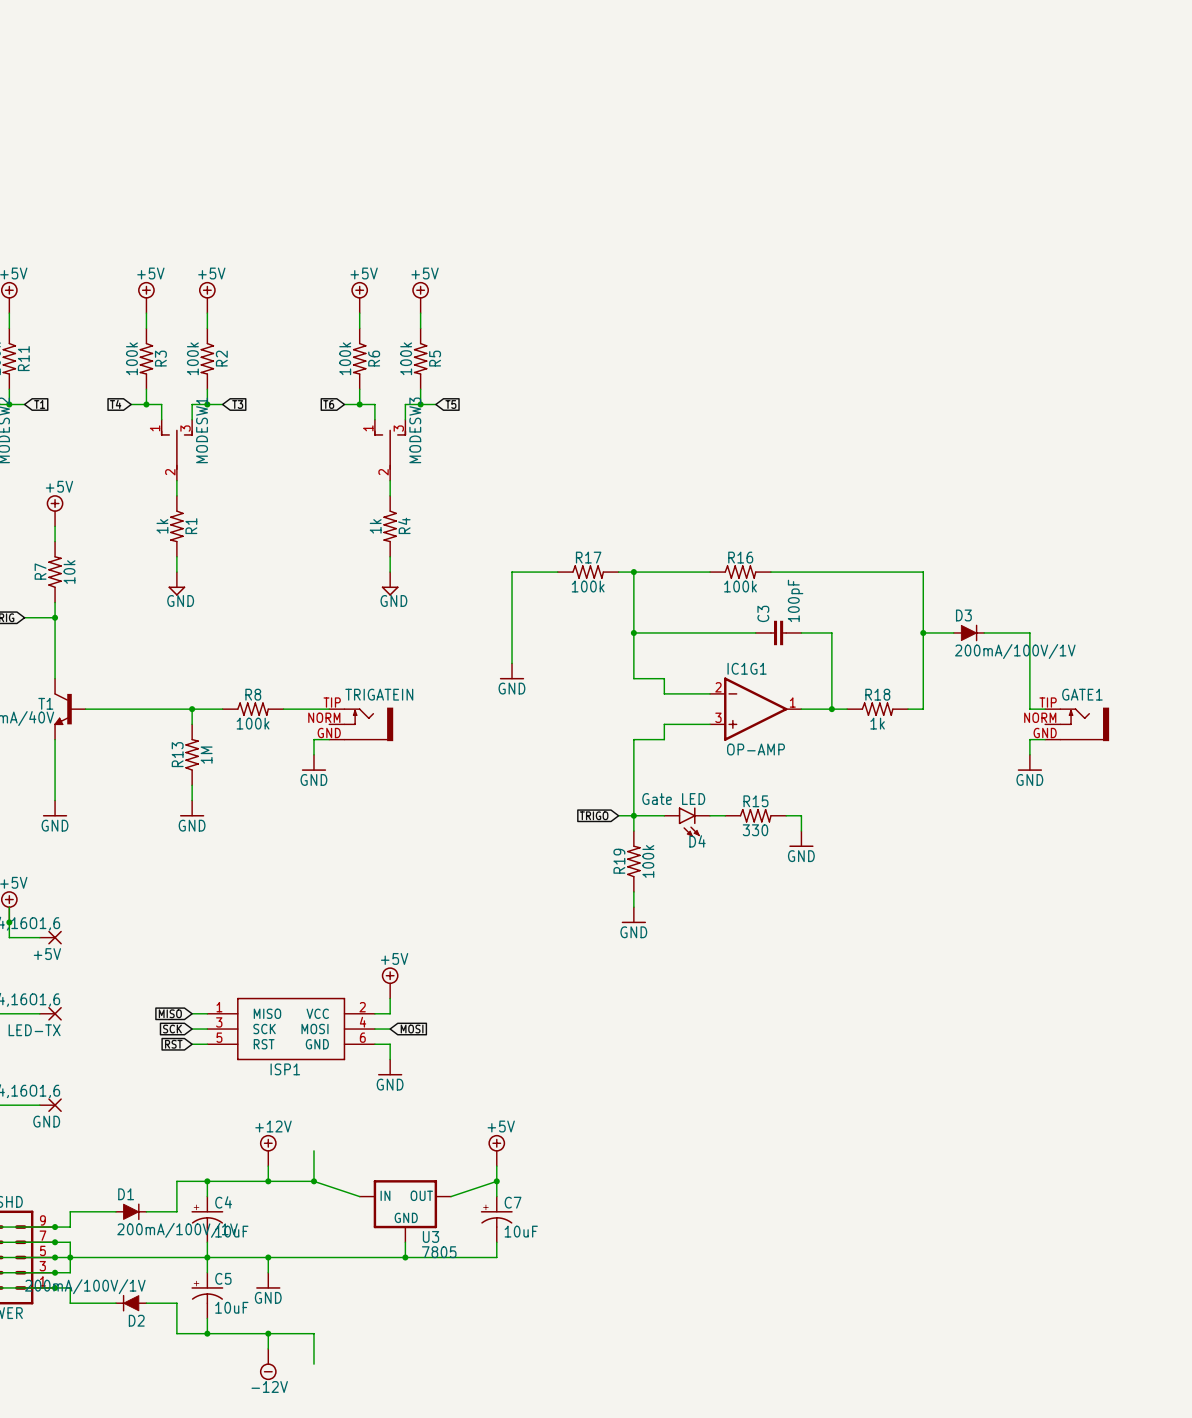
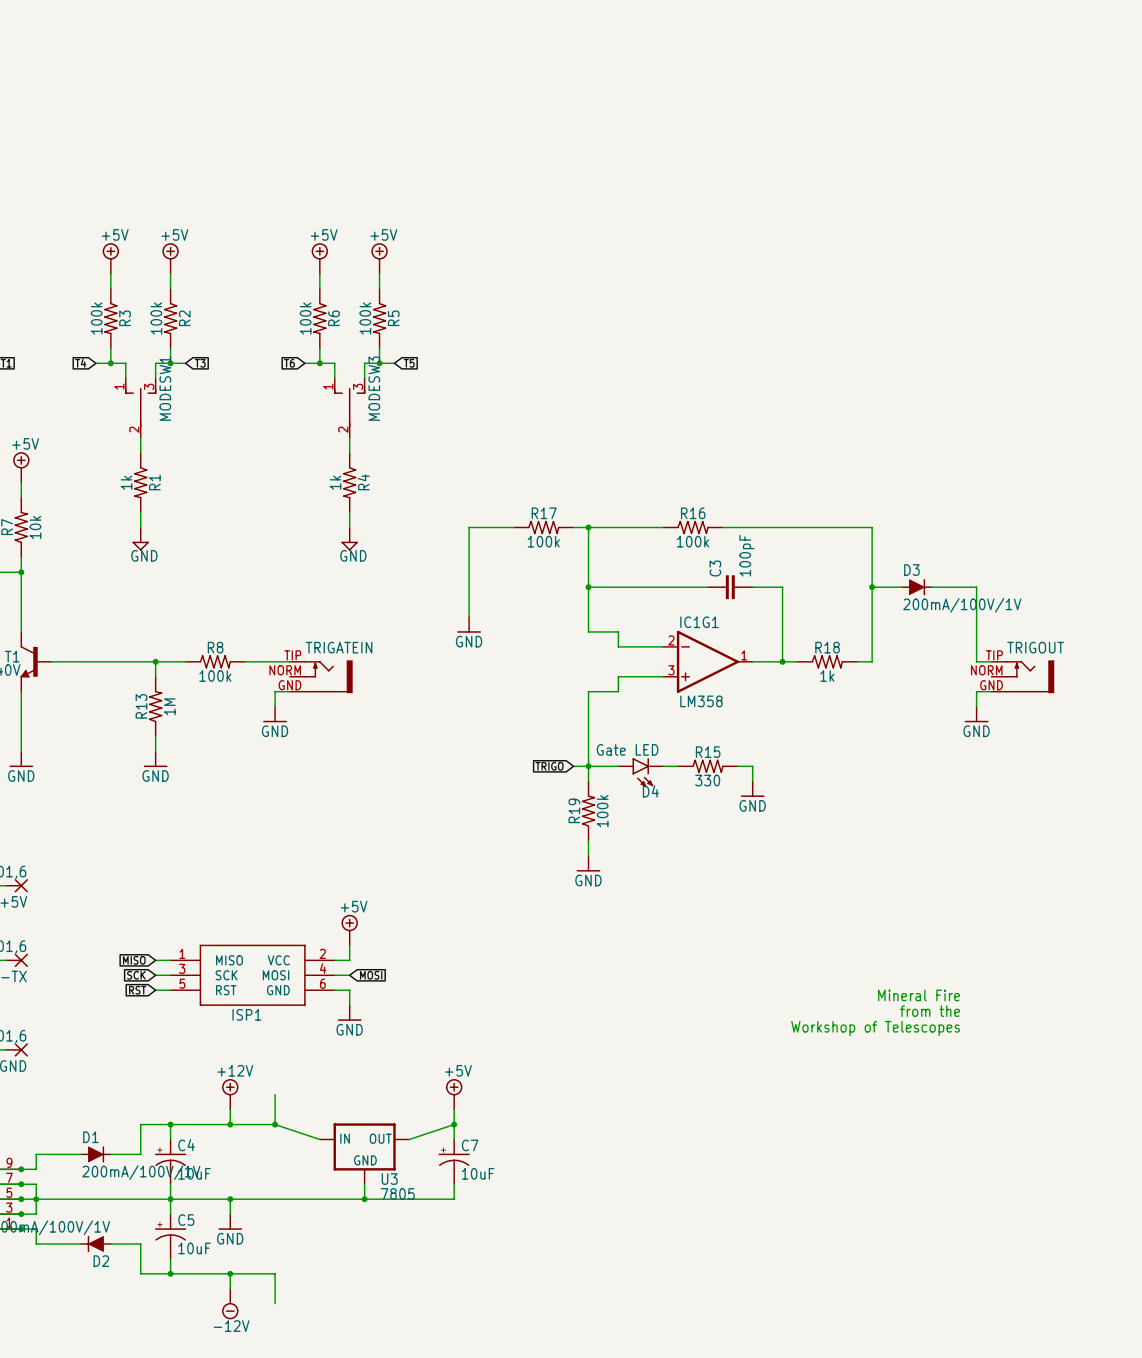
GATE1 name: GATE1 (1082, 694) -> TRIGOUT (1035, 647)
IC1G1 value: OP-AMP (755, 749) -> LM358 (701, 701)
text: none -> Mineral Fire (919, 995)
text: none -> from the (930, 1011)
text: none -> Workshop of Telescopes (875, 1028)

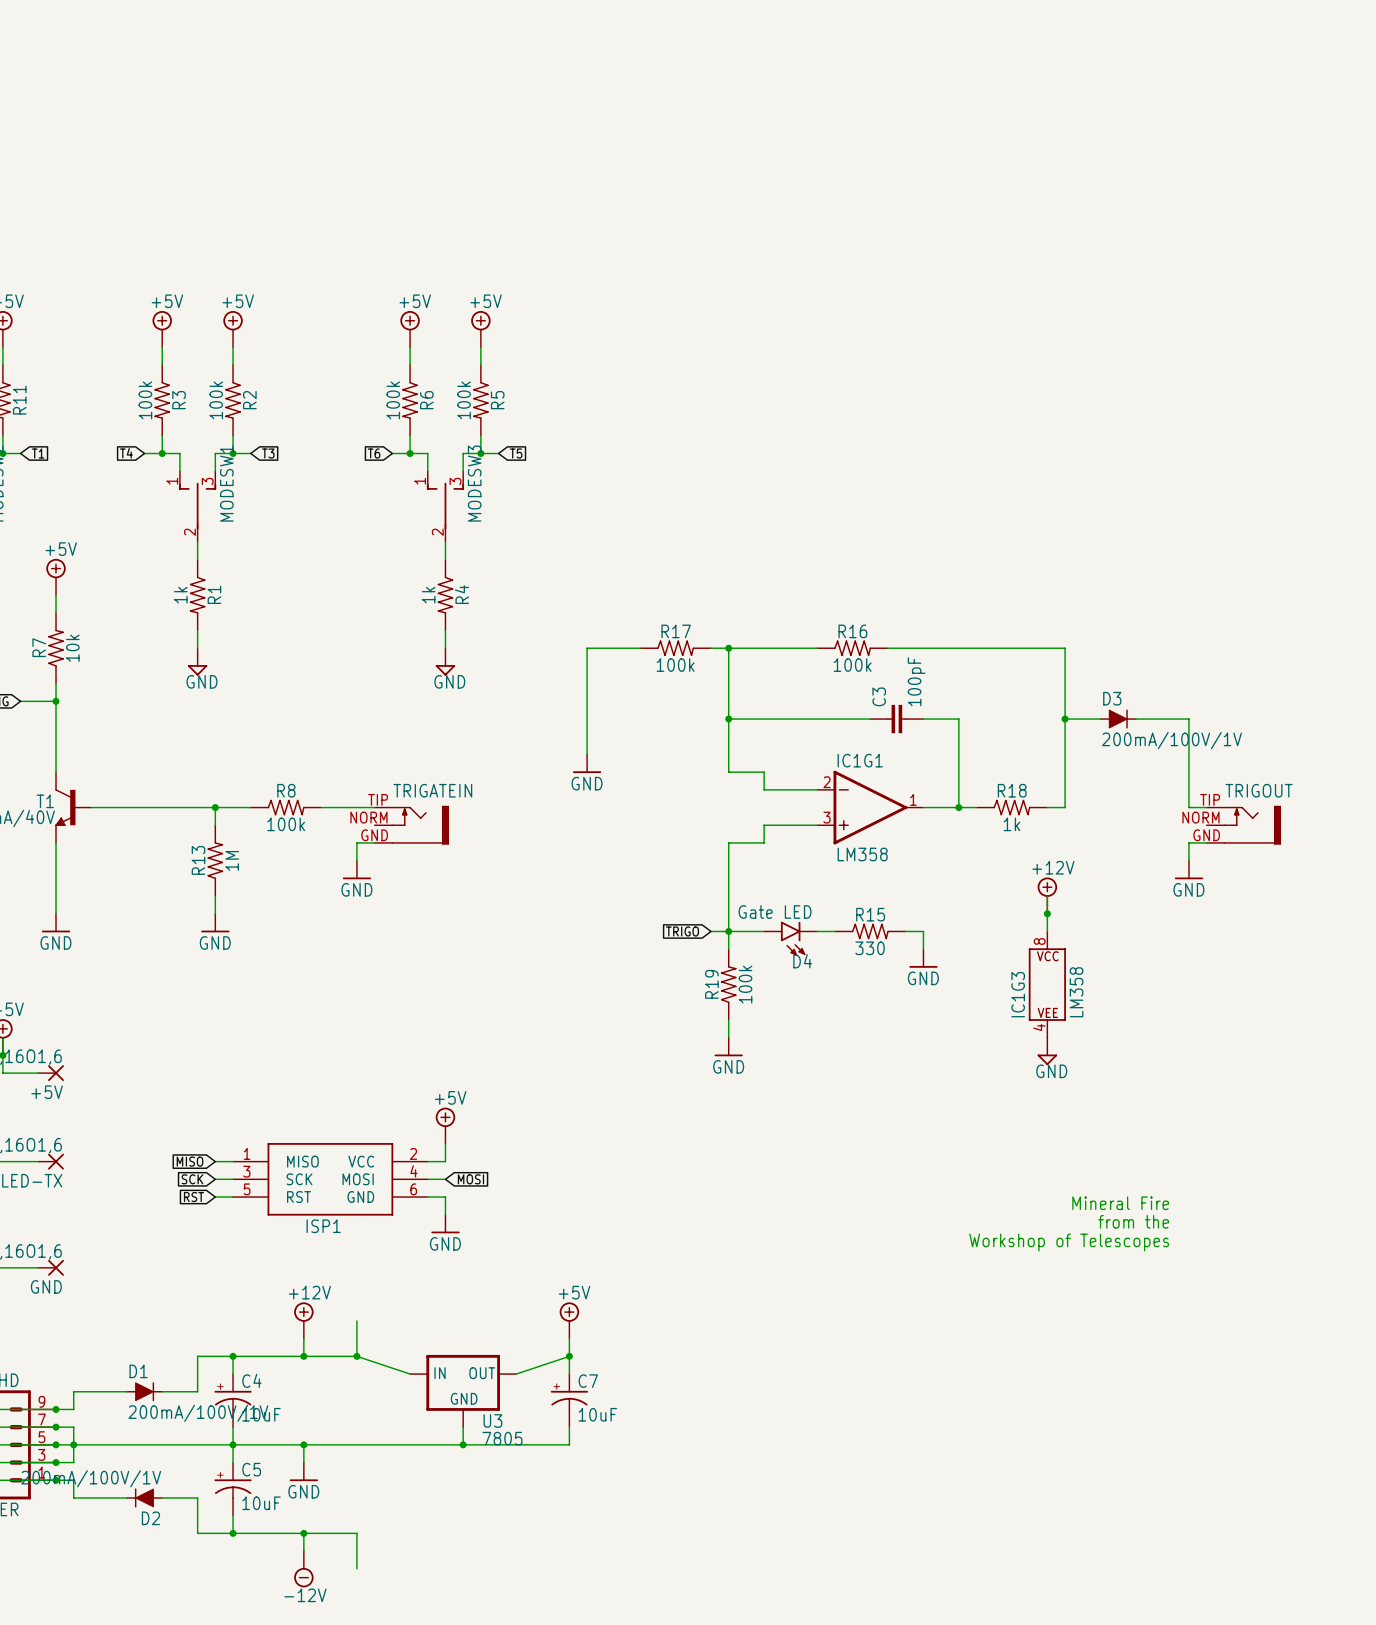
wire: none -> (1047, 896) (1047, 931)
power symbol: none -> +12V (1047, 895)
junction: none -> (1047, 913)
IC1G3: none -> LM358 (1047, 984)
power symbol: none -> GND (1047, 1051)

